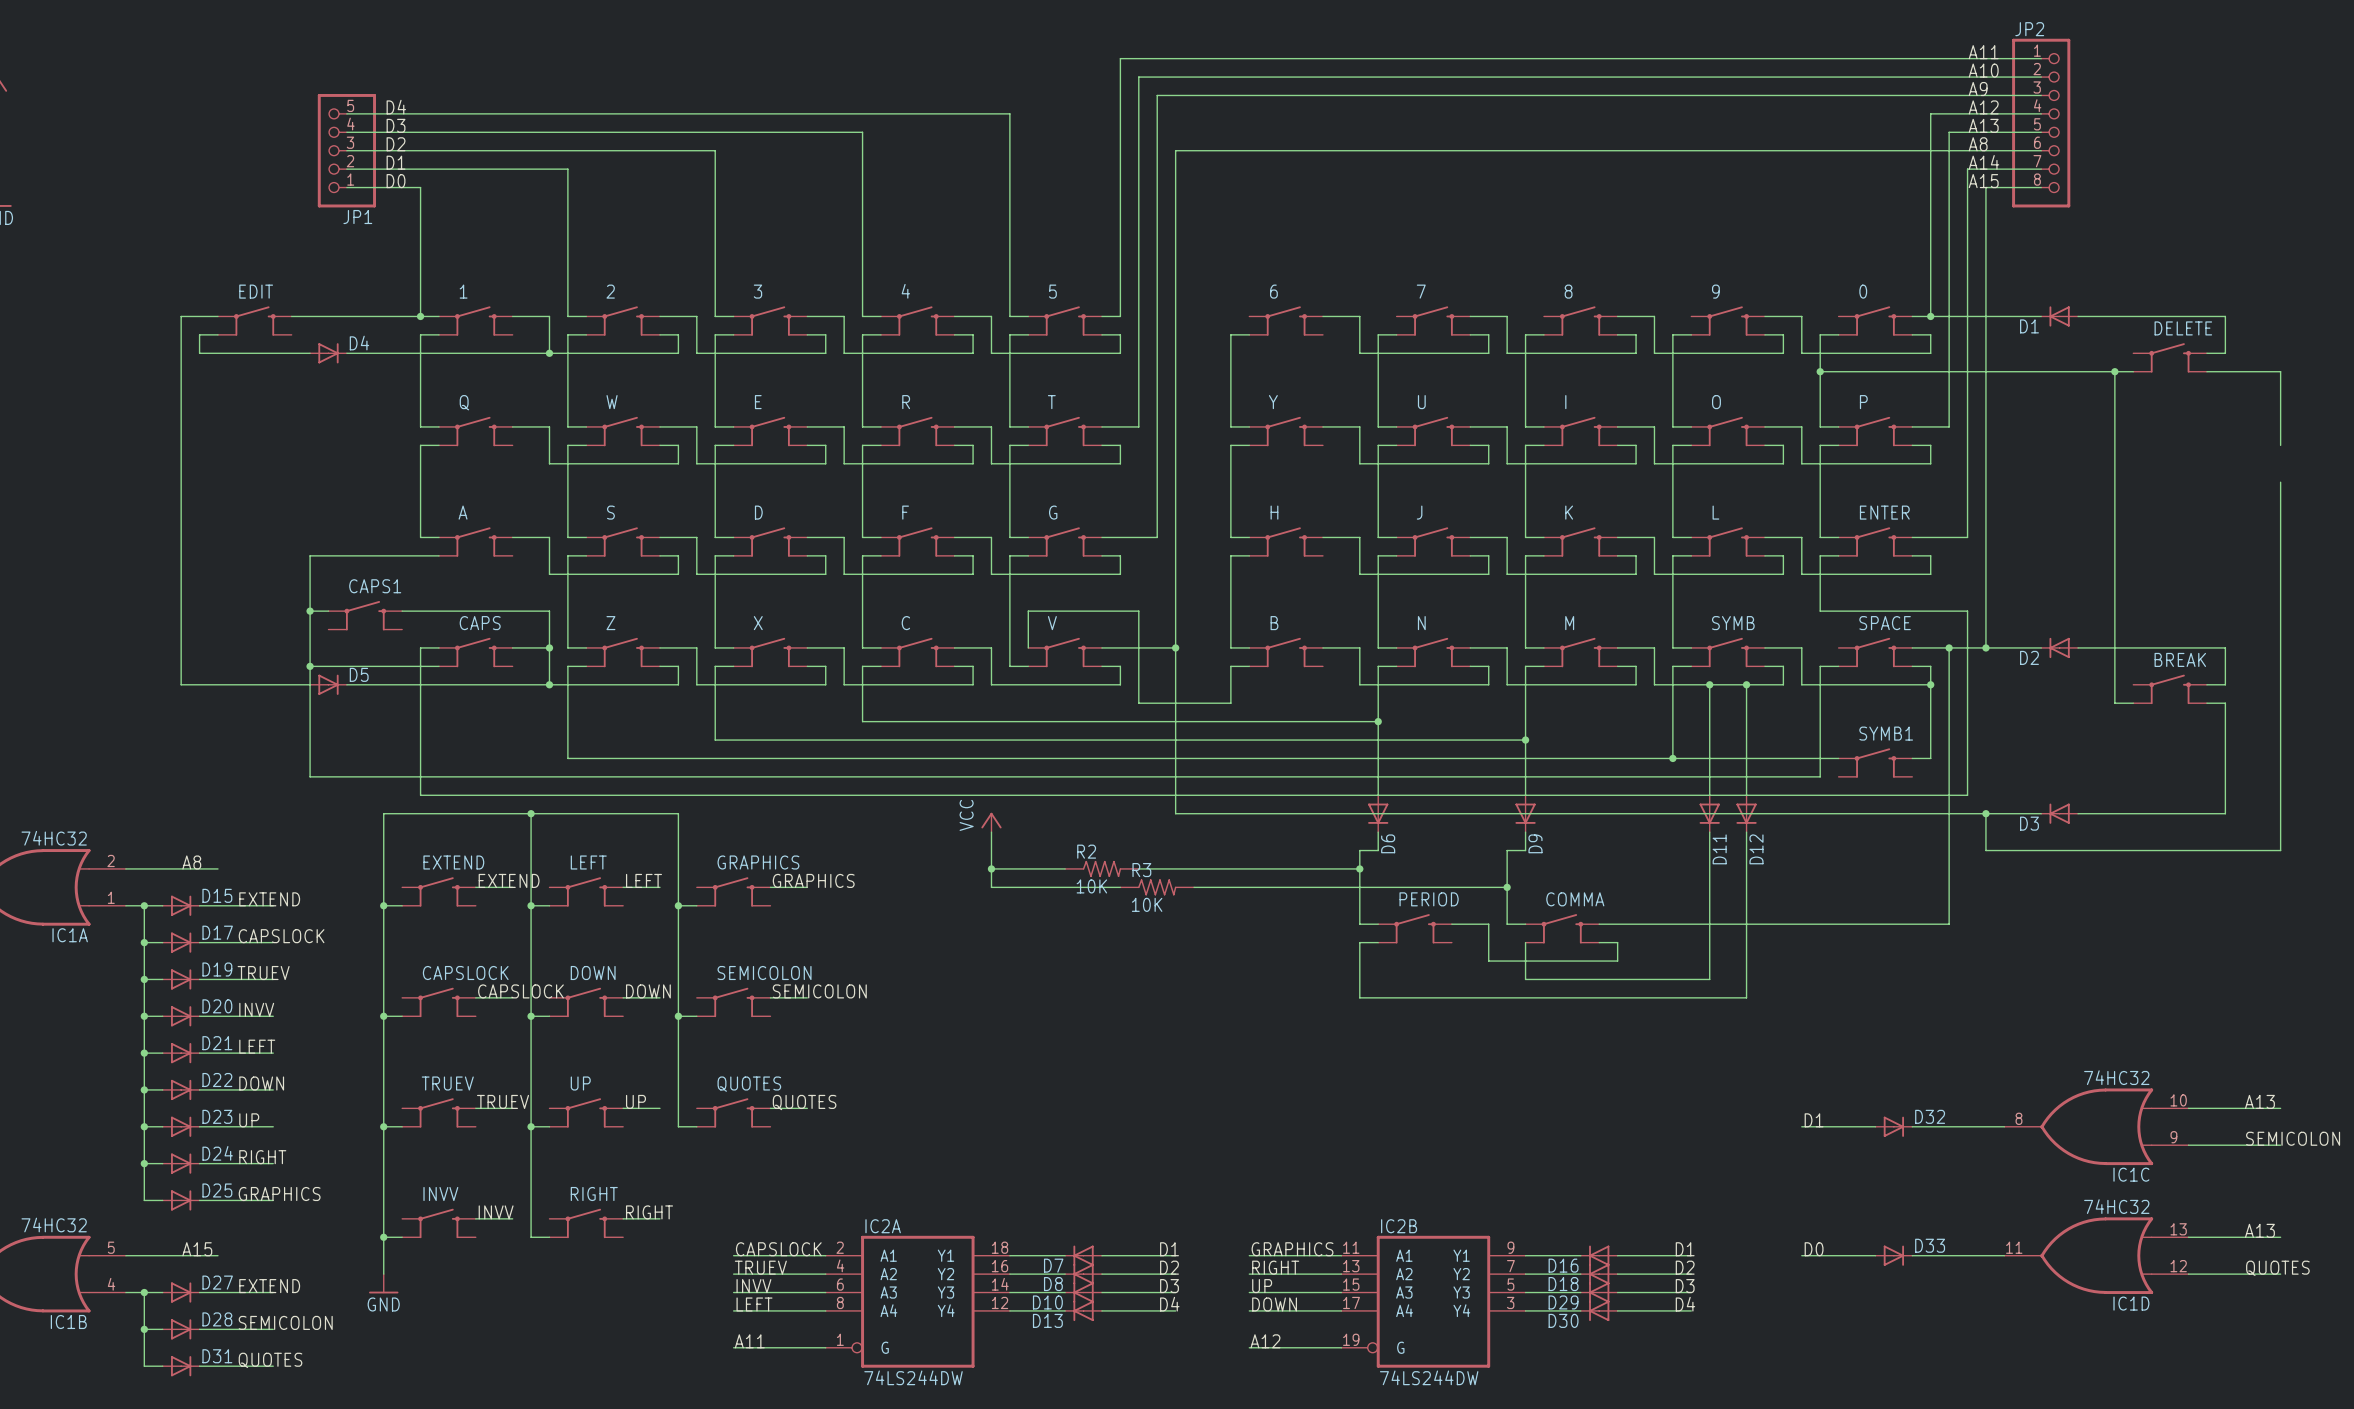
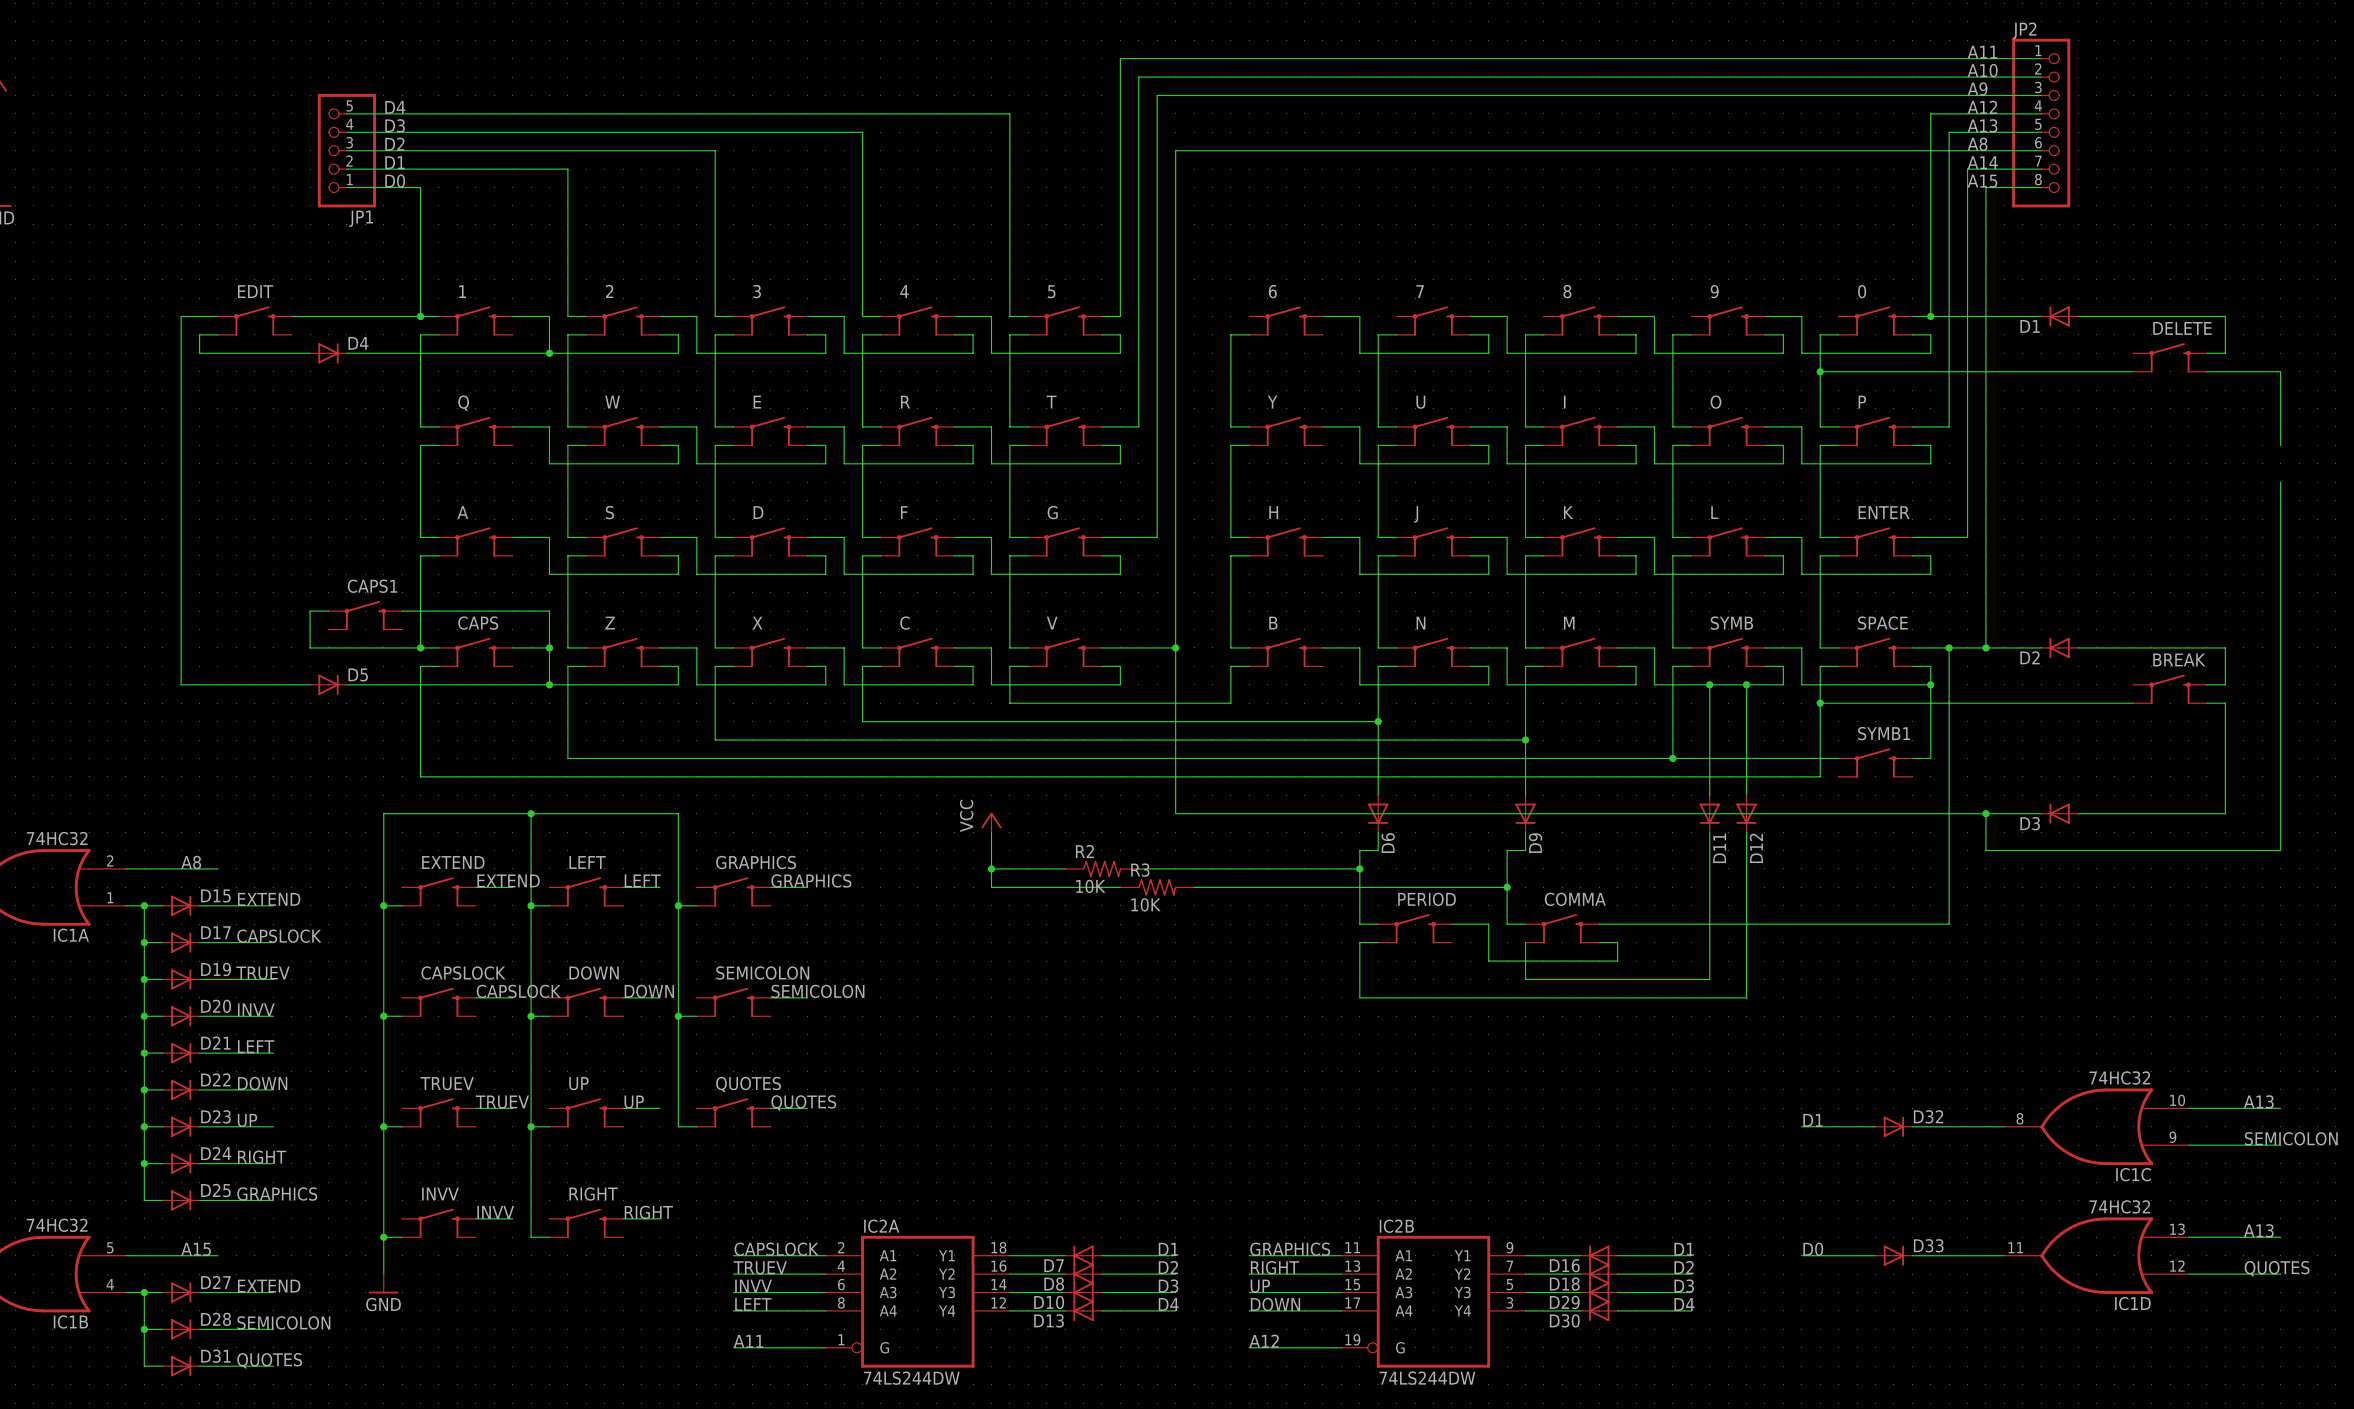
wire: (2114, 371) (2114, 703) -> (1820, 703) (2114, 703)
junction: (2114, 371) -> none
wire: (420, 555) (310, 555) (310, 611) -> (420, 555) (420, 647) (310, 647)
junction: (310, 611) -> none
wire: (1820, 611) (1967, 611) (1967, 795) (420, 795) (420, 776) (310, 776) (310, 647) -> (1820, 611) (1820, 647) (1838, 647)
wire: (420, 647) (420, 666) (310, 666) -> none
junction: none -> (420, 647)
wire: (1009, 647) (1009, 666) -> (1009, 647) (1028, 647)
wire: (1028, 647) (1028, 611) (1138, 611) (1138, 703) -> (1009, 666) (1009, 703) (1138, 703)
junction: (310, 666) -> none
junction: none -> (1820, 703)

